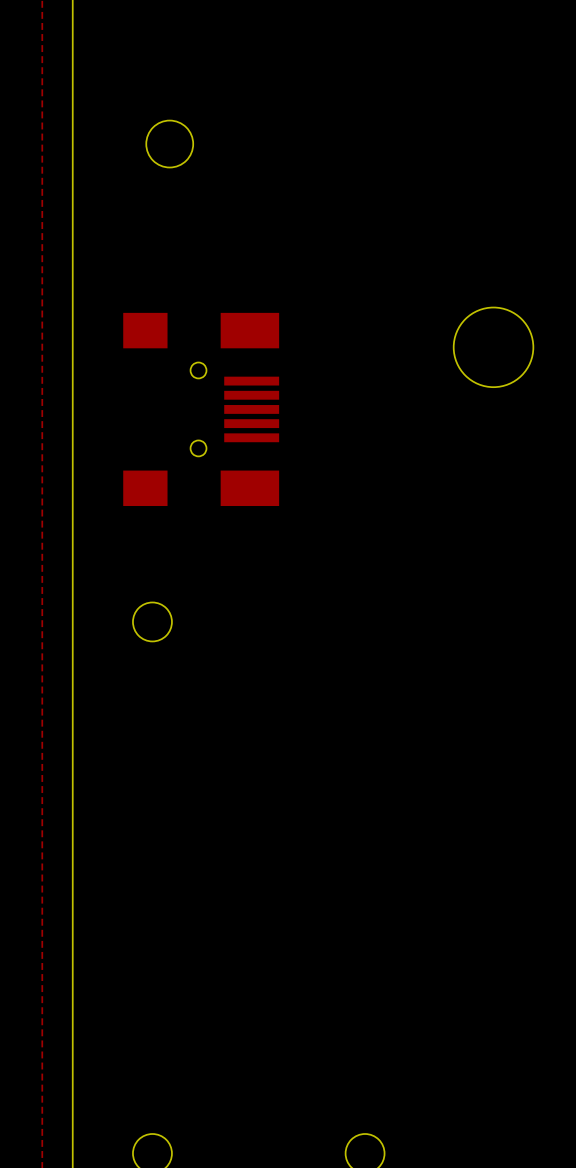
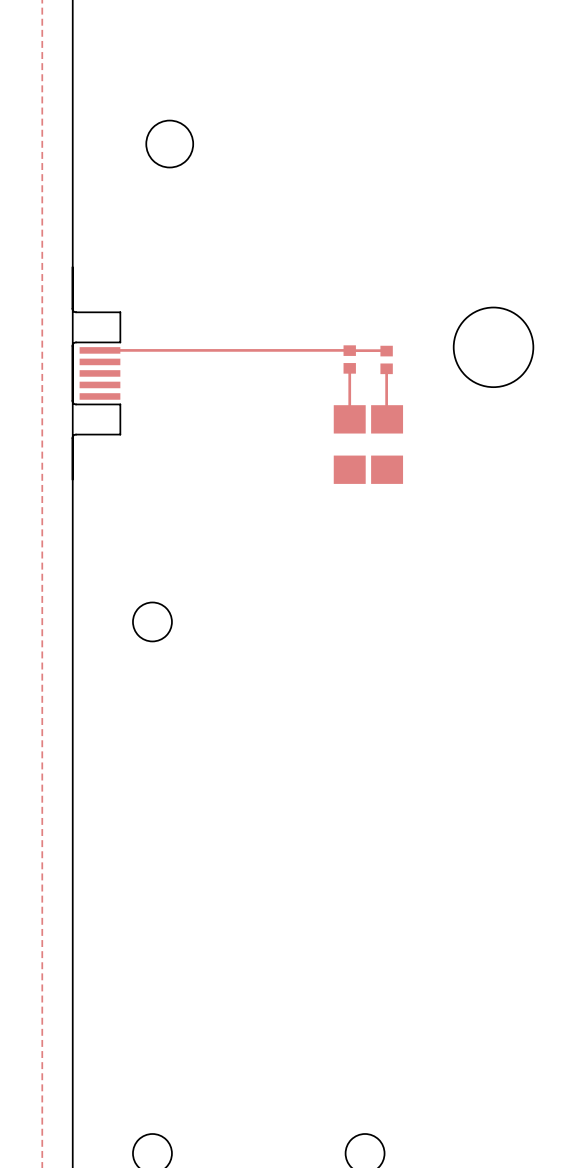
top track: none -> (349, 350) (99, 350)
top track: none -> (349, 350) (386, 351)
part: none -> (349, 359)
part: none -> (386, 359)
top track: none -> (349, 368) (349, 419)
top track: none -> (386, 368) (387, 419)
part: none -> (96, 373)
part: (201, 409) -> none
part: none -> (349, 444)
part: none -> (387, 444)

